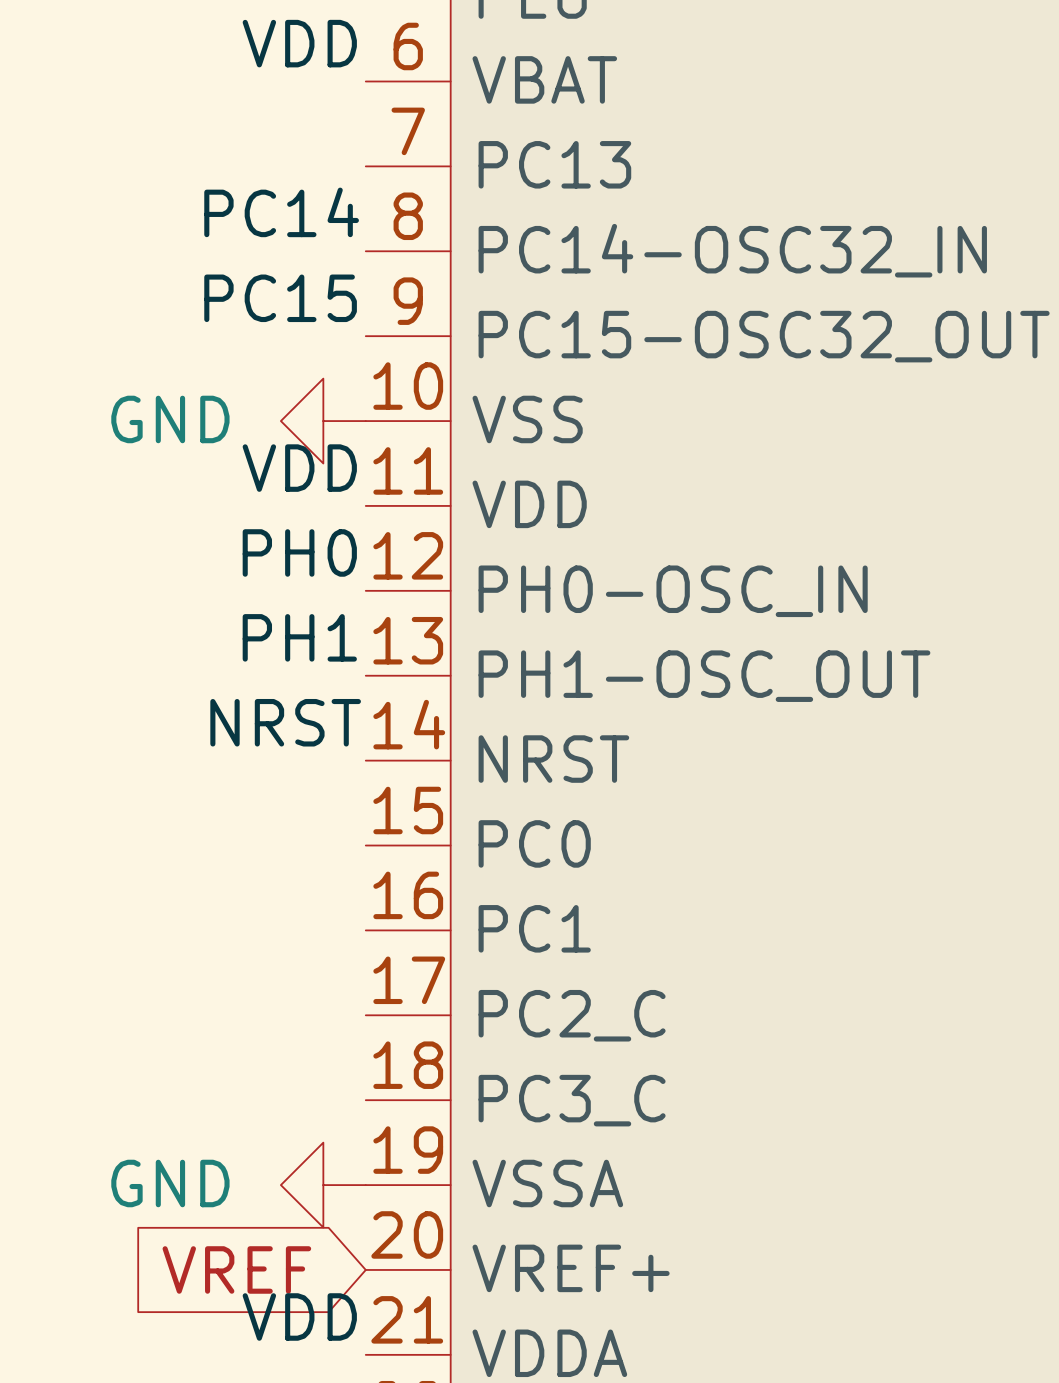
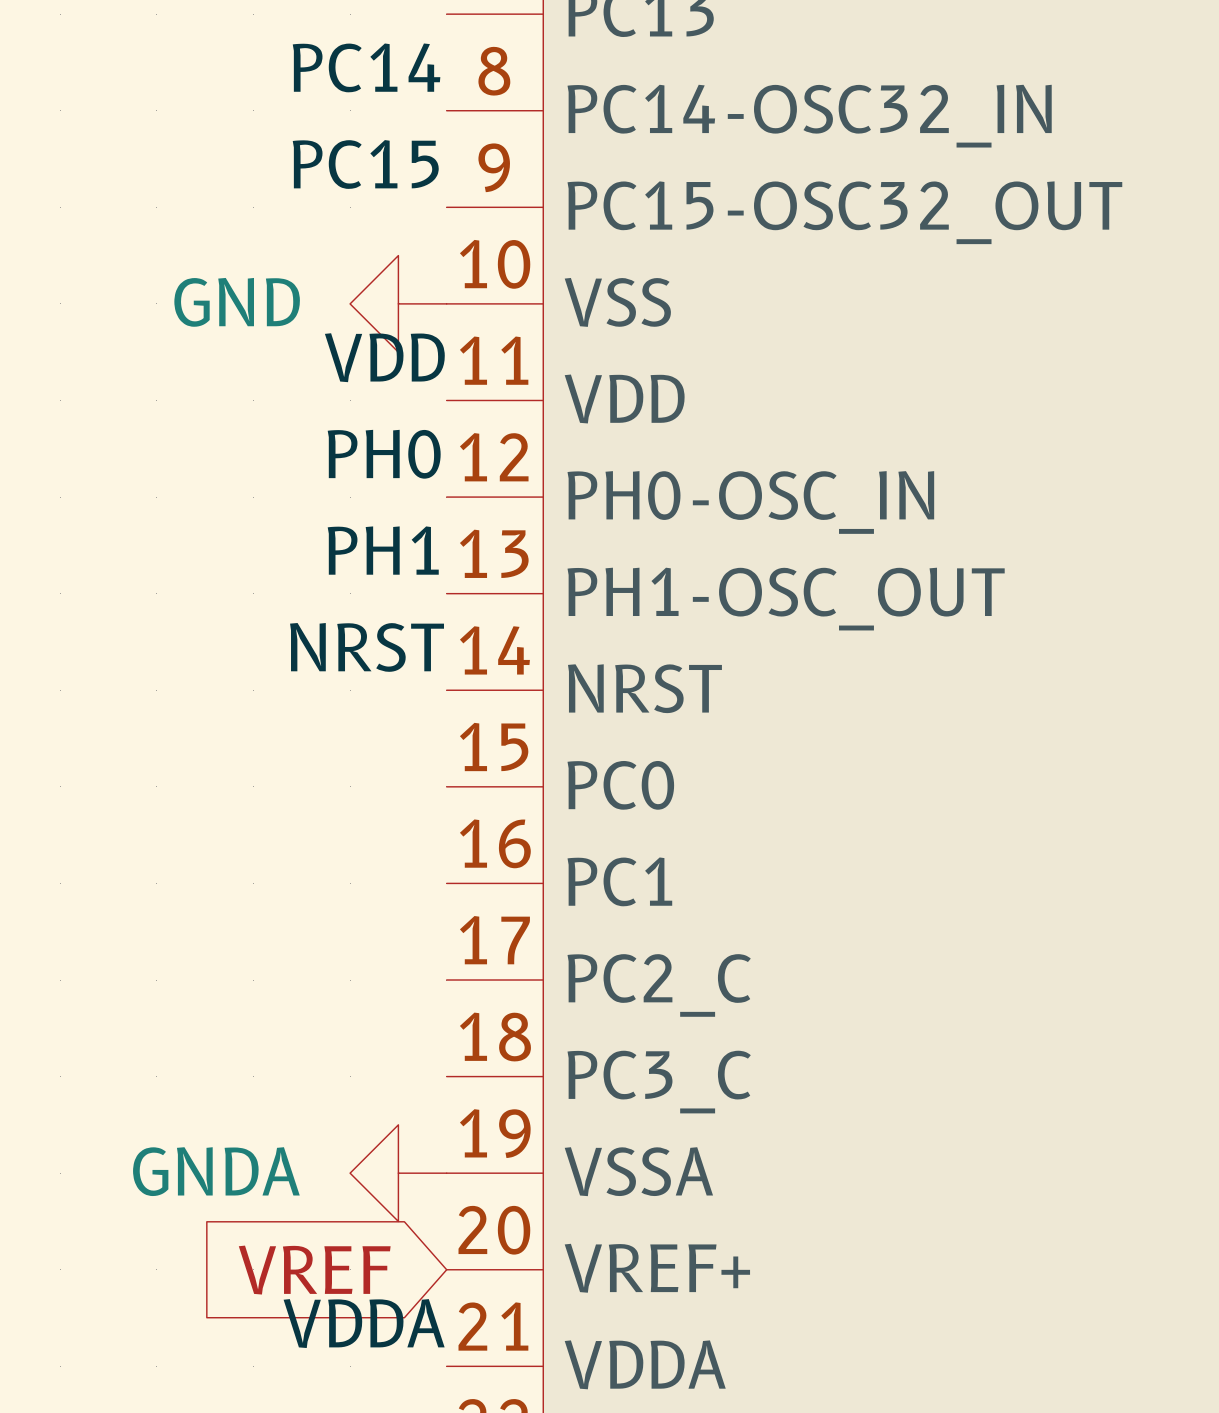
power symbol: GND (323, 1185) -> GNDA (398, 1173)
label: VDD (299, 1316) -> VDDA (364, 1323)

